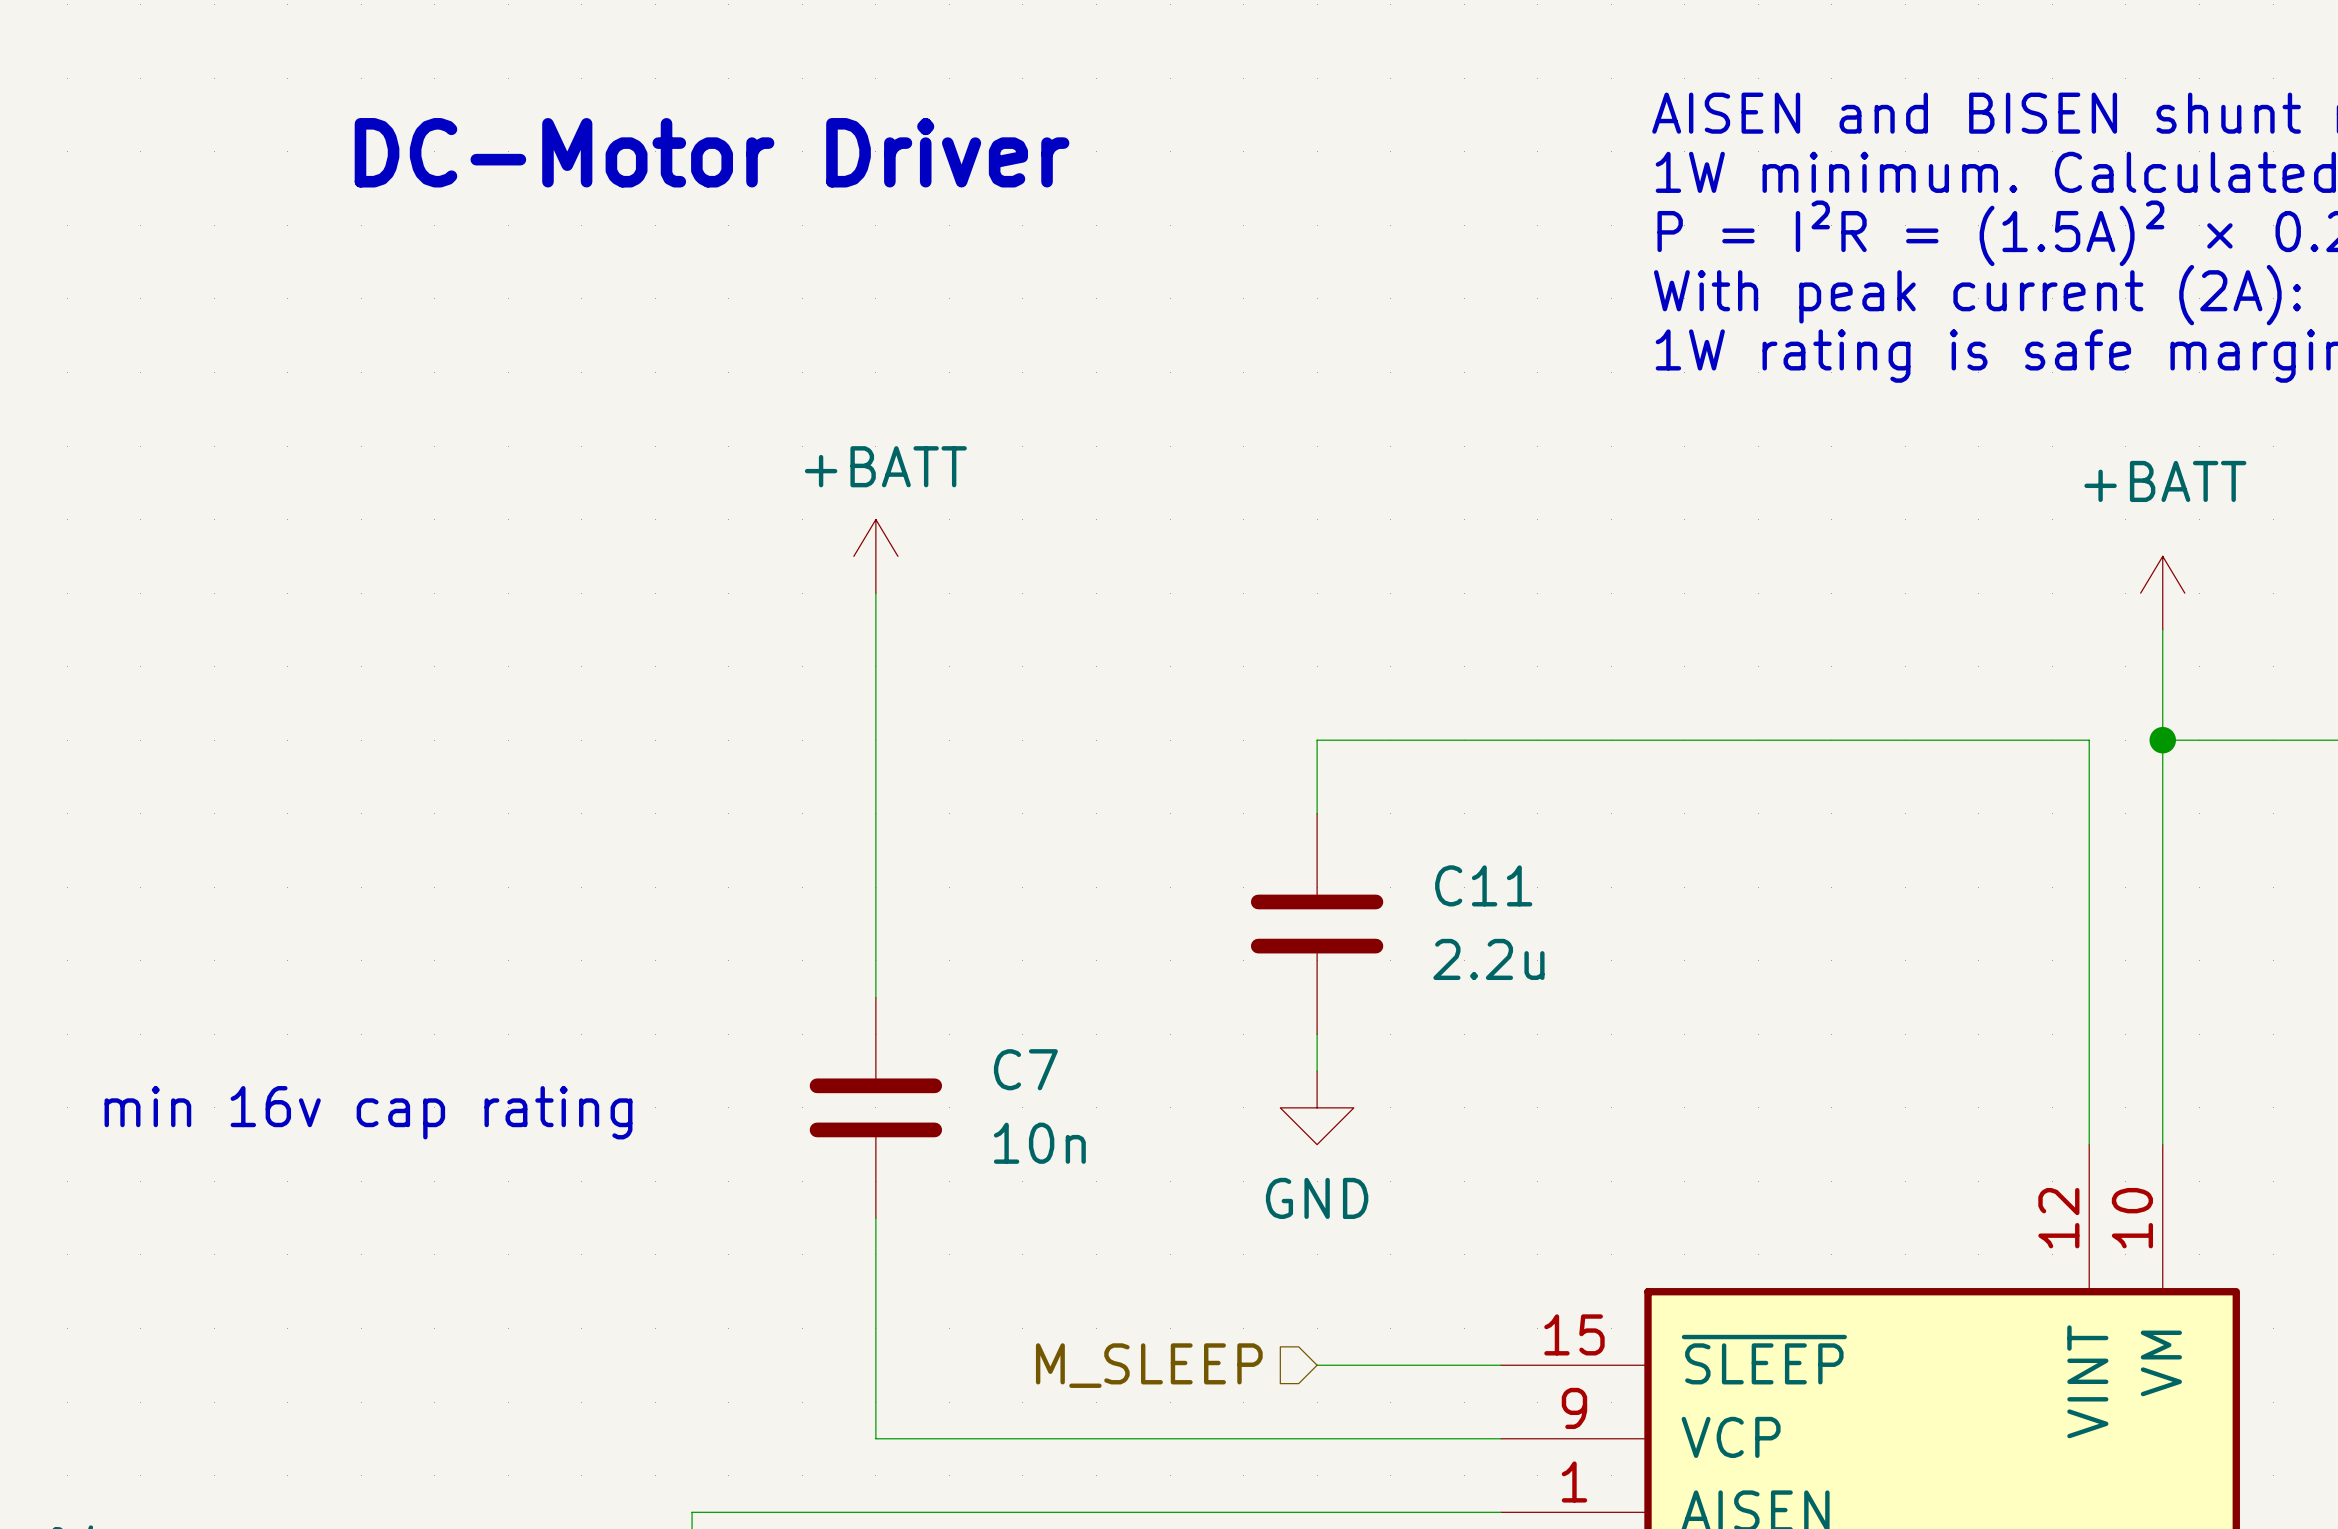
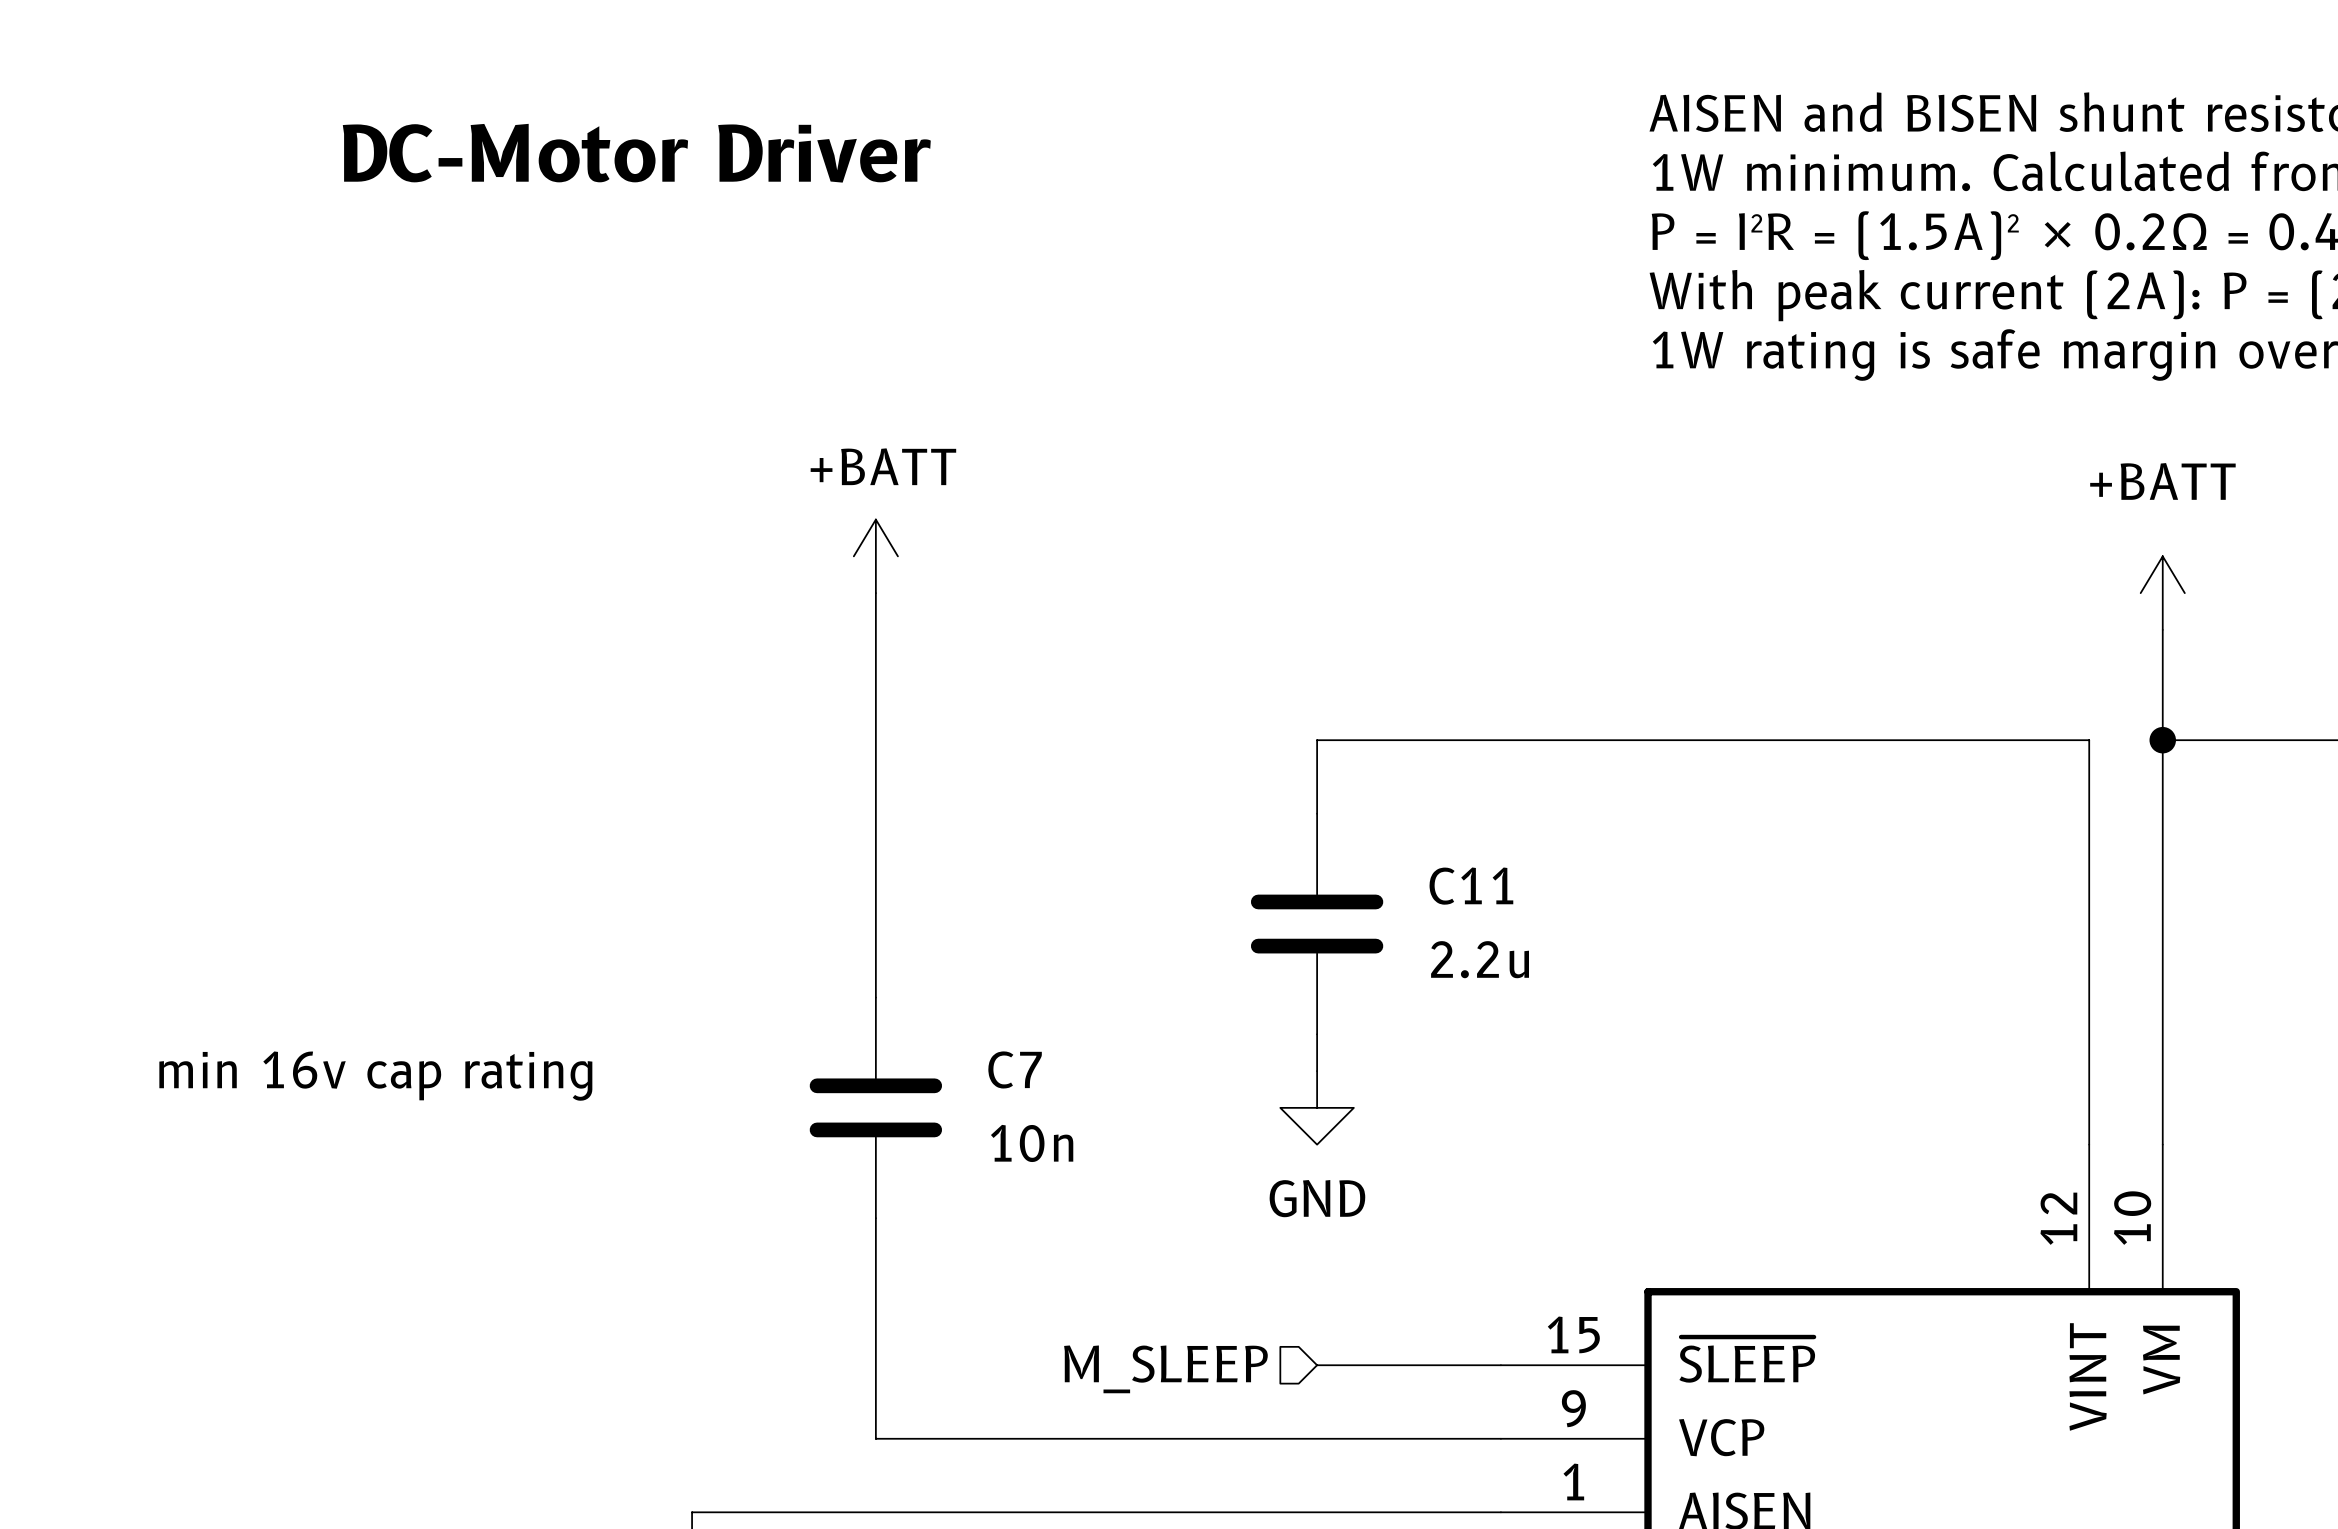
text position: min 16v cap rating (368, 1112) -> min 16v cap rating (375, 1076)

